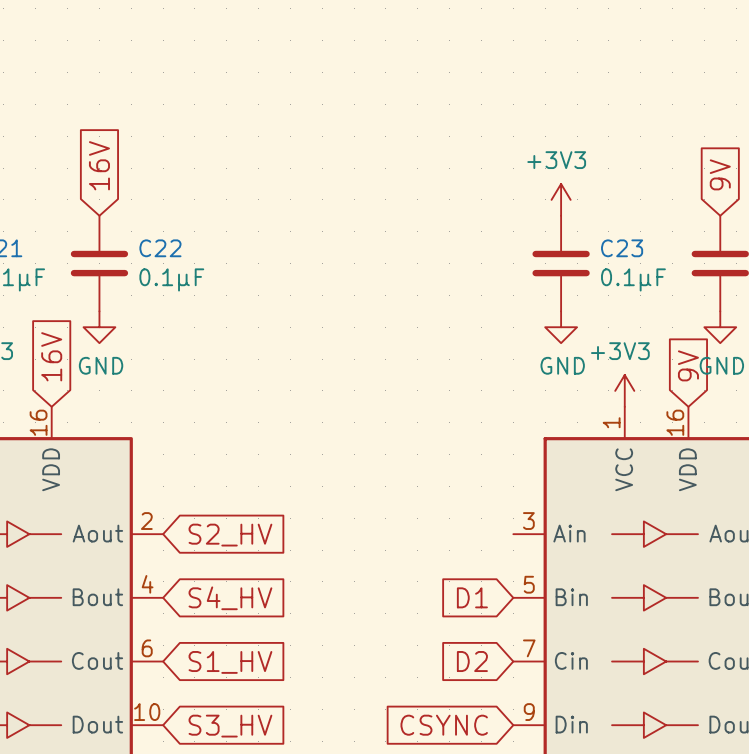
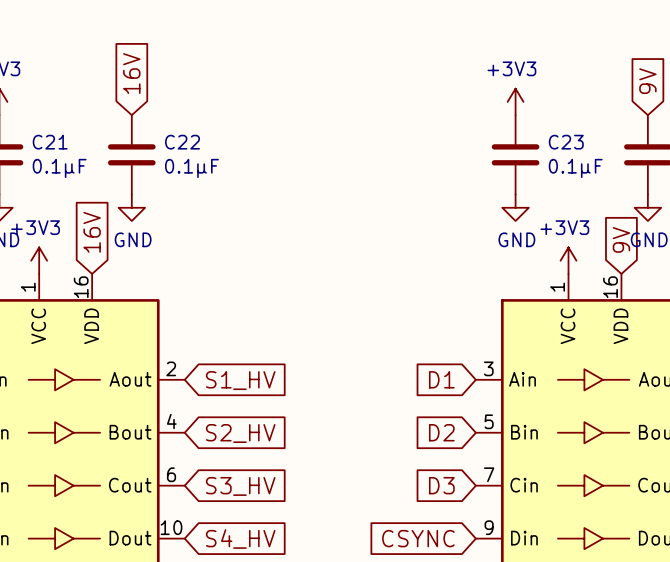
global label: none -> D1 (441, 379)
global label: S2_HV (230, 535) -> S1_HV (240, 380)
global label: D1 (472, 597) -> D2 (441, 432)
global label: S4_HV (230, 598) -> S2_HV (240, 433)
global label: D2 (472, 661) -> D3 (441, 485)
global label: S1_HV (230, 662) -> S3_HV (240, 486)
global label: S3_HV (230, 726) -> S4_HV (240, 538)

